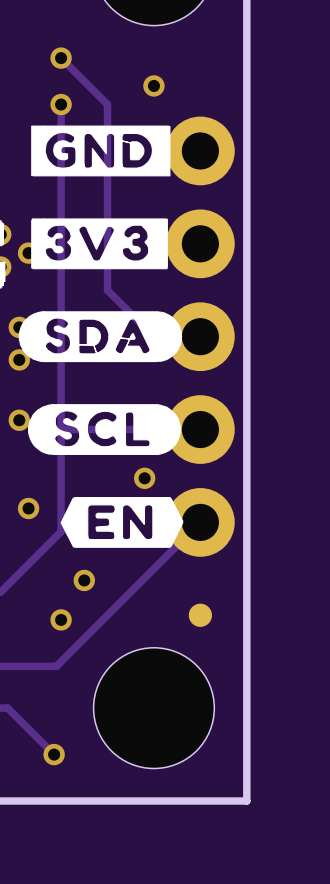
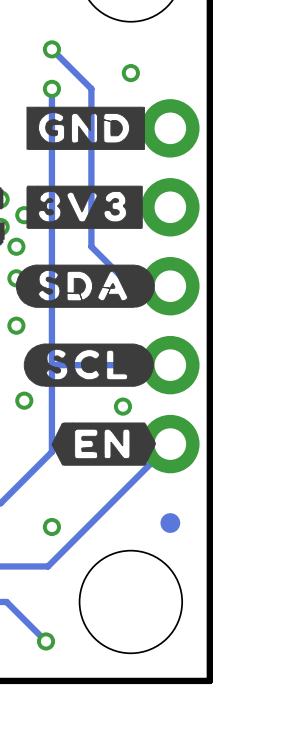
via: none -> (16, 246)
via: (19, 359) -> none
via: none -> (16, 325)
via: (19, 420) -> none
via: none -> (24, 400)
via: (28, 508) -> none
via: (84, 580) -> none

